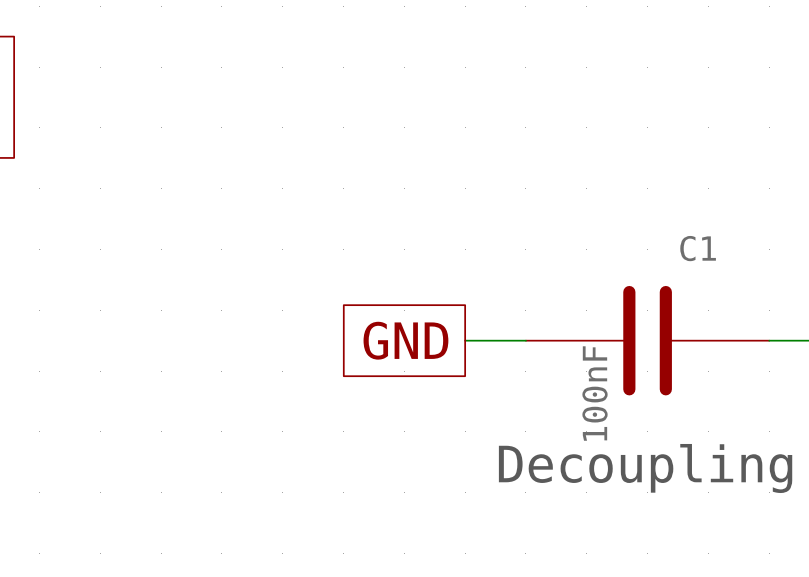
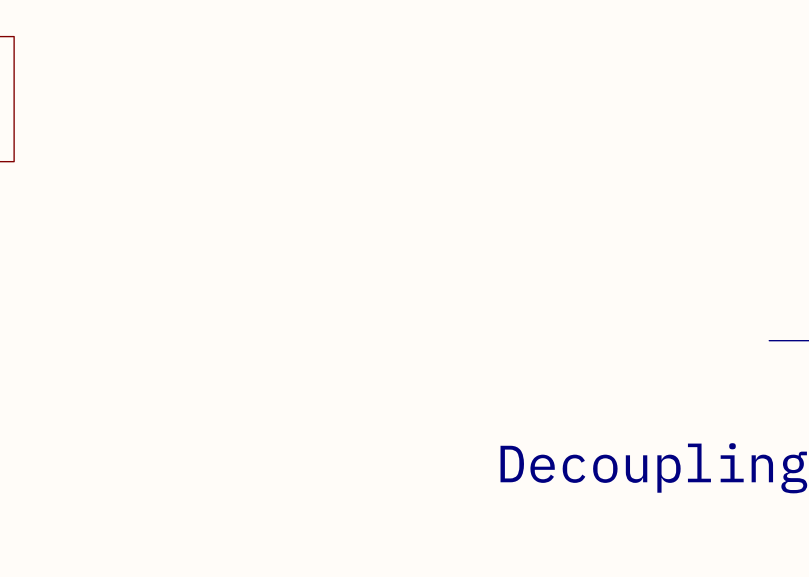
global label: GND (405, 340) -> none
wire: (465, 340) (525, 340) -> none
C1: 100nF (647, 340) -> none

